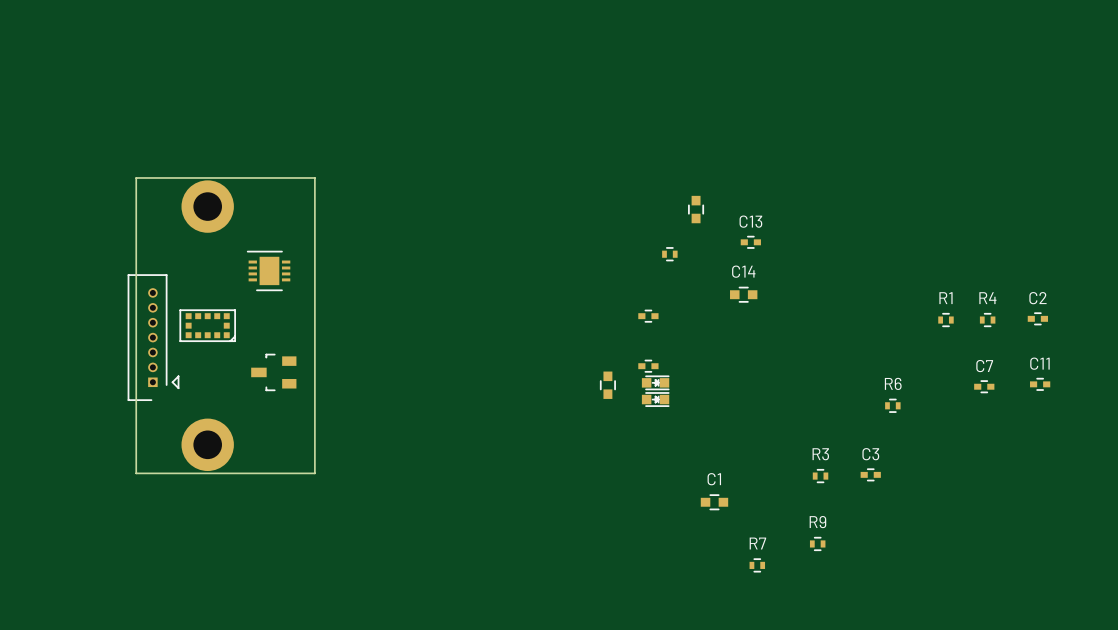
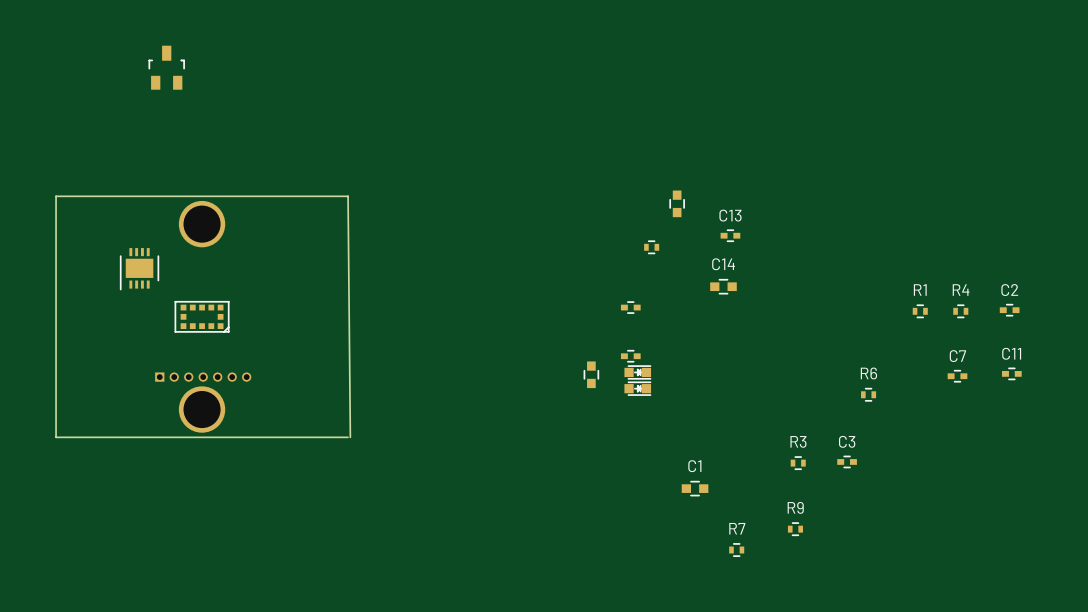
part: none -> (166, 67)
board edge: (136, 177) (136, 473) (314, 473) (314, 177) (136, 177) -> none
part: (207, 206) -> none
part: none -> (202, 224)
part rotation: 0° (268, 270) -> 90° counterclockwise (139, 269)
part position: (268, 270) -> (139, 269)
part side: top (153, 337) -> bottom (203, 377)
part: (273, 372) -> none
part: none -> (202, 409)
part: (207, 444) -> none
board edge: none -> (348, 437) (56, 437) (56, 196) (348, 196) (350, 437)

